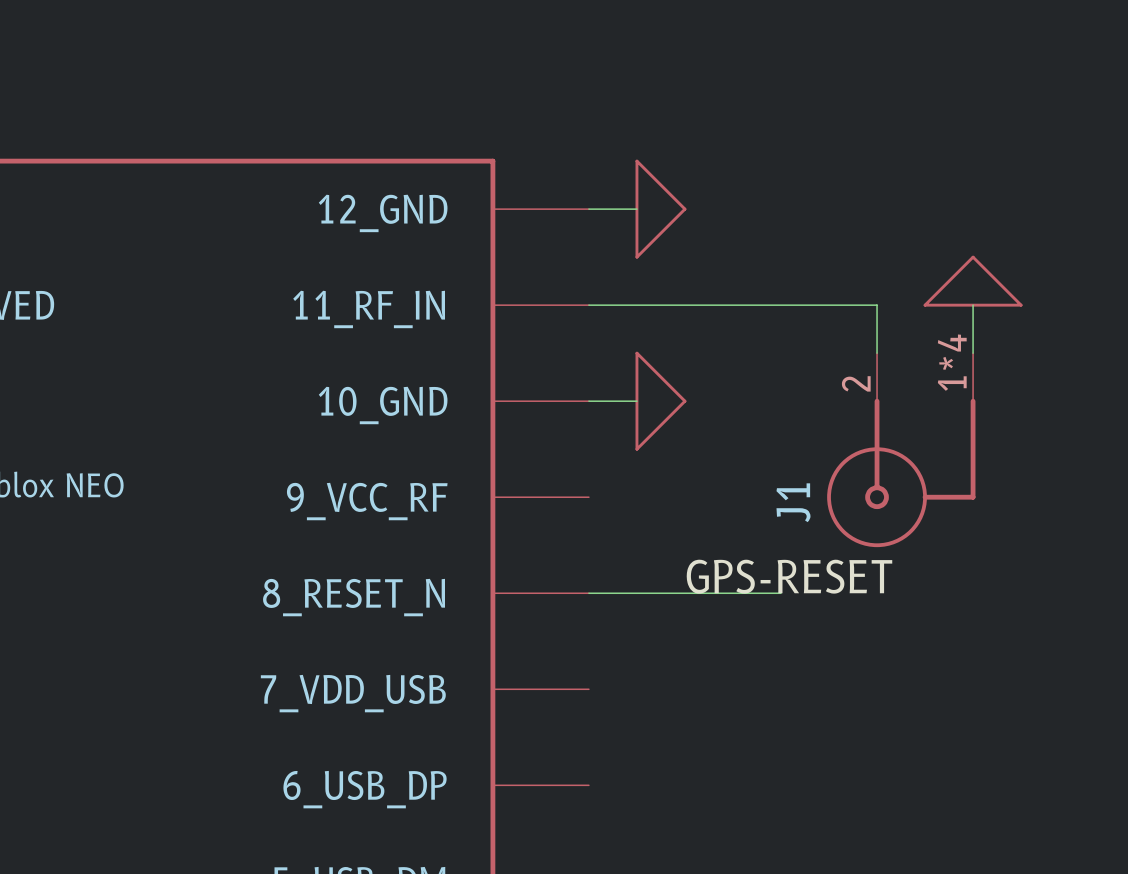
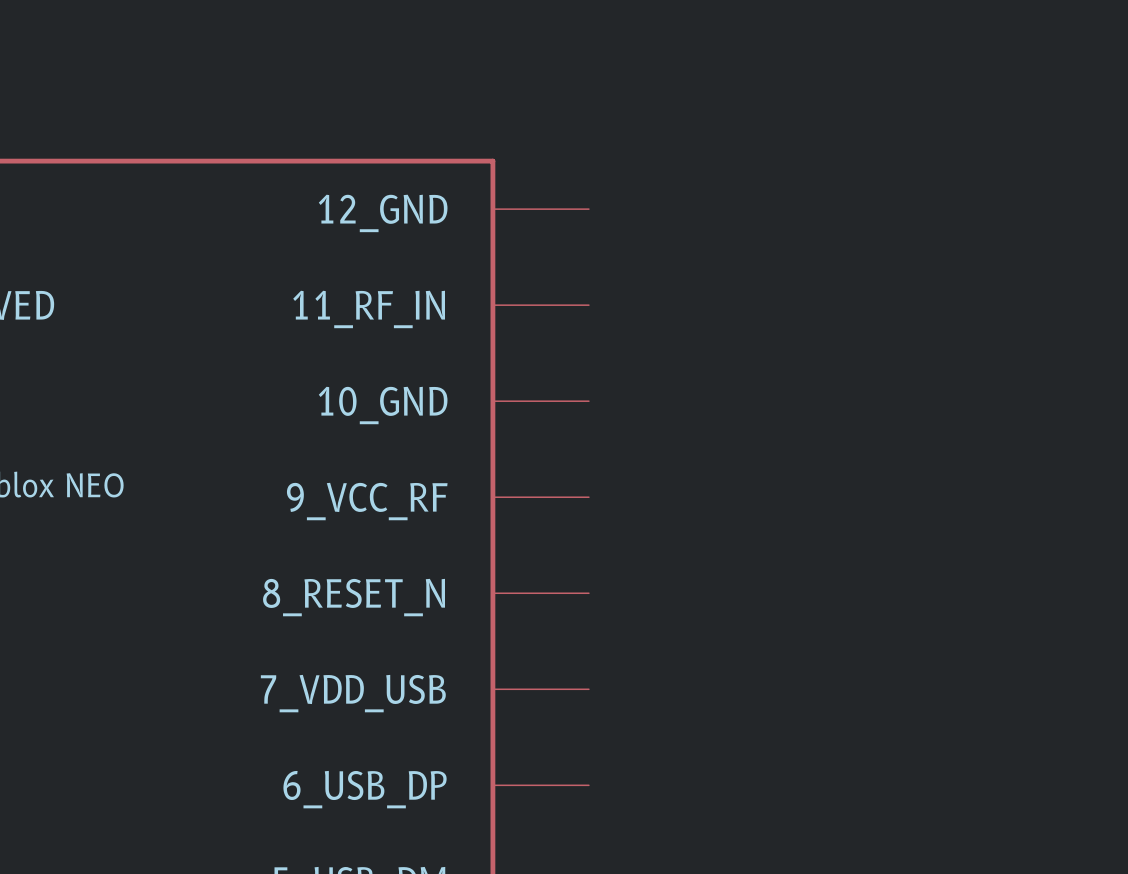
wire: (588, 209) (636, 209) -> none
power symbol: (660, 209) -> none
power symbol: (973, 281) -> none
wire: (588, 305) (877, 305) (877, 353) -> none
wire: (973, 305) (973, 353) -> none
wire: (588, 401) (636, 401) -> none
power symbol: (660, 401) -> none
J1: (901, 450) -> none
label: GPS-RESET (789, 576) -> none
wire: (588, 593) (781, 593) -> none

